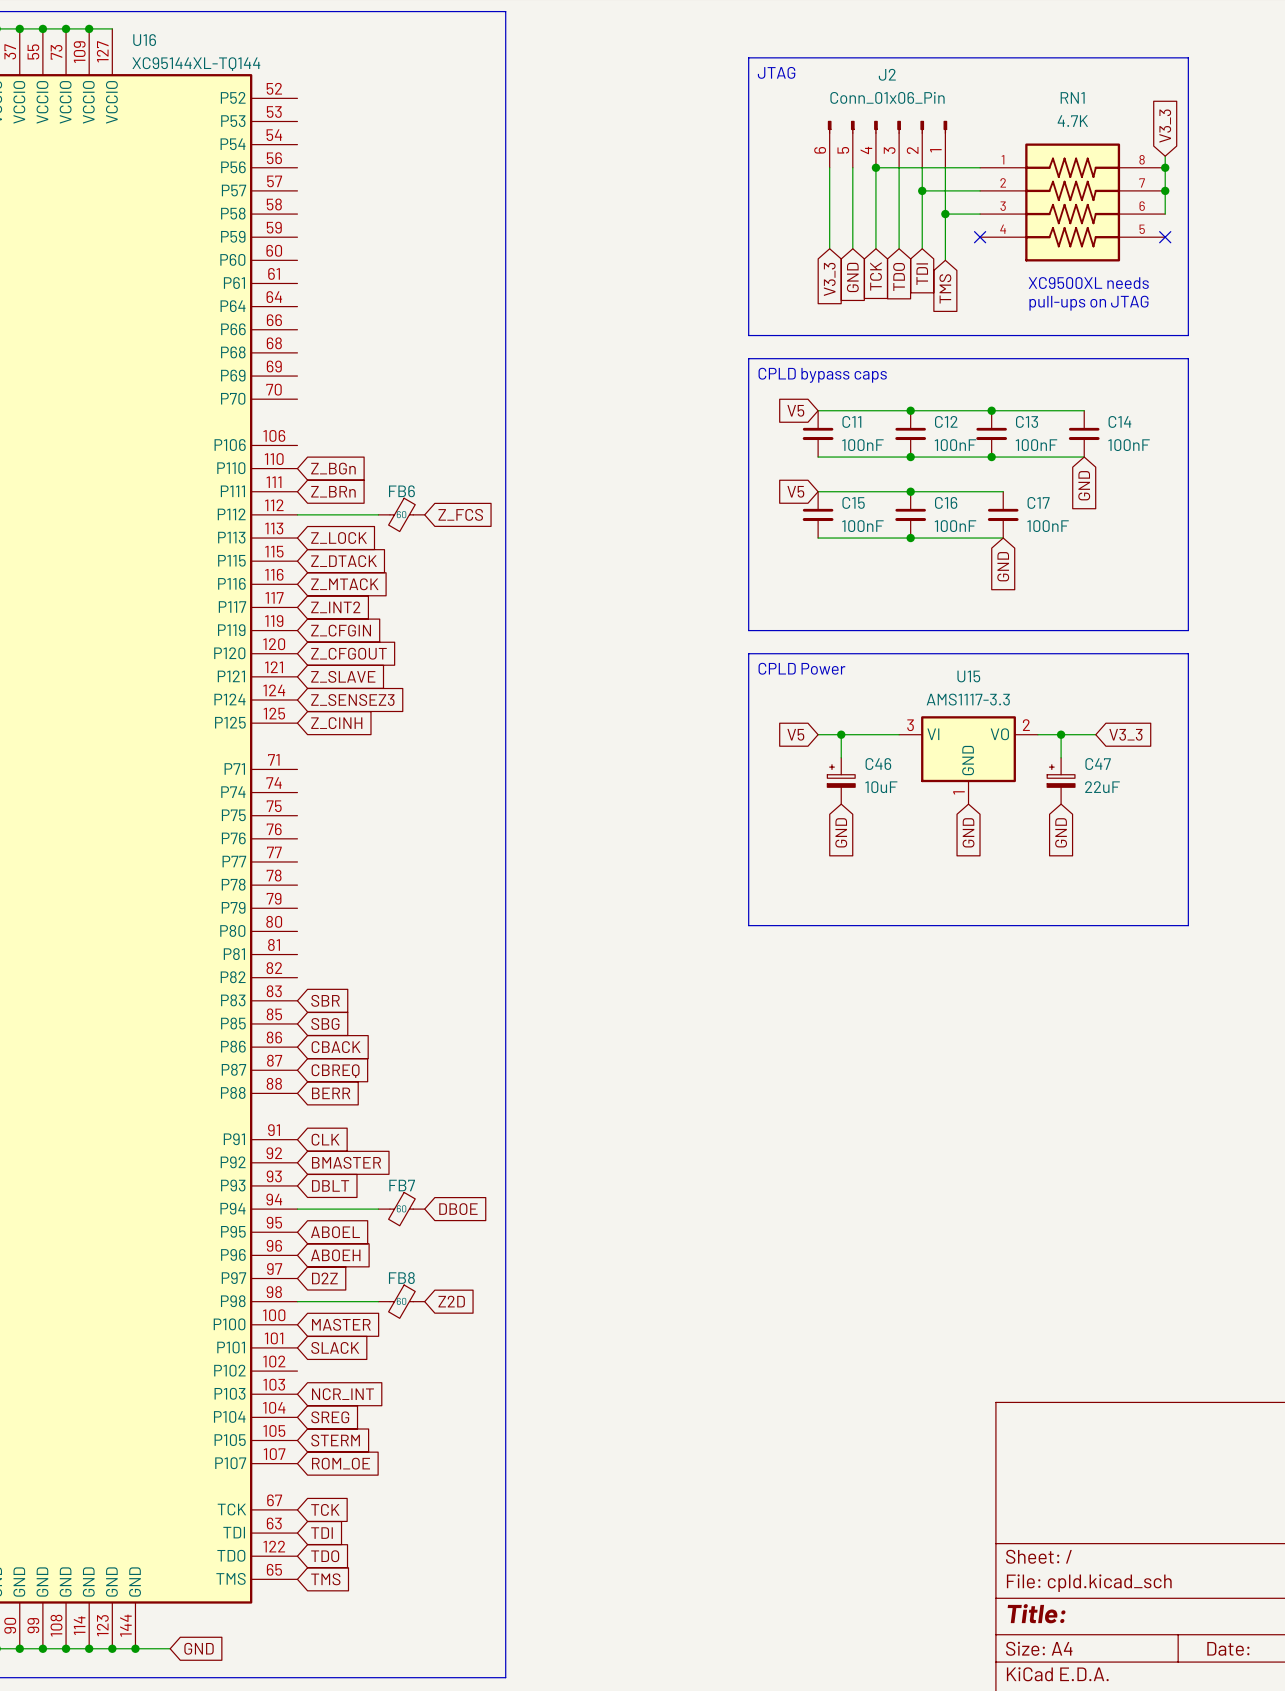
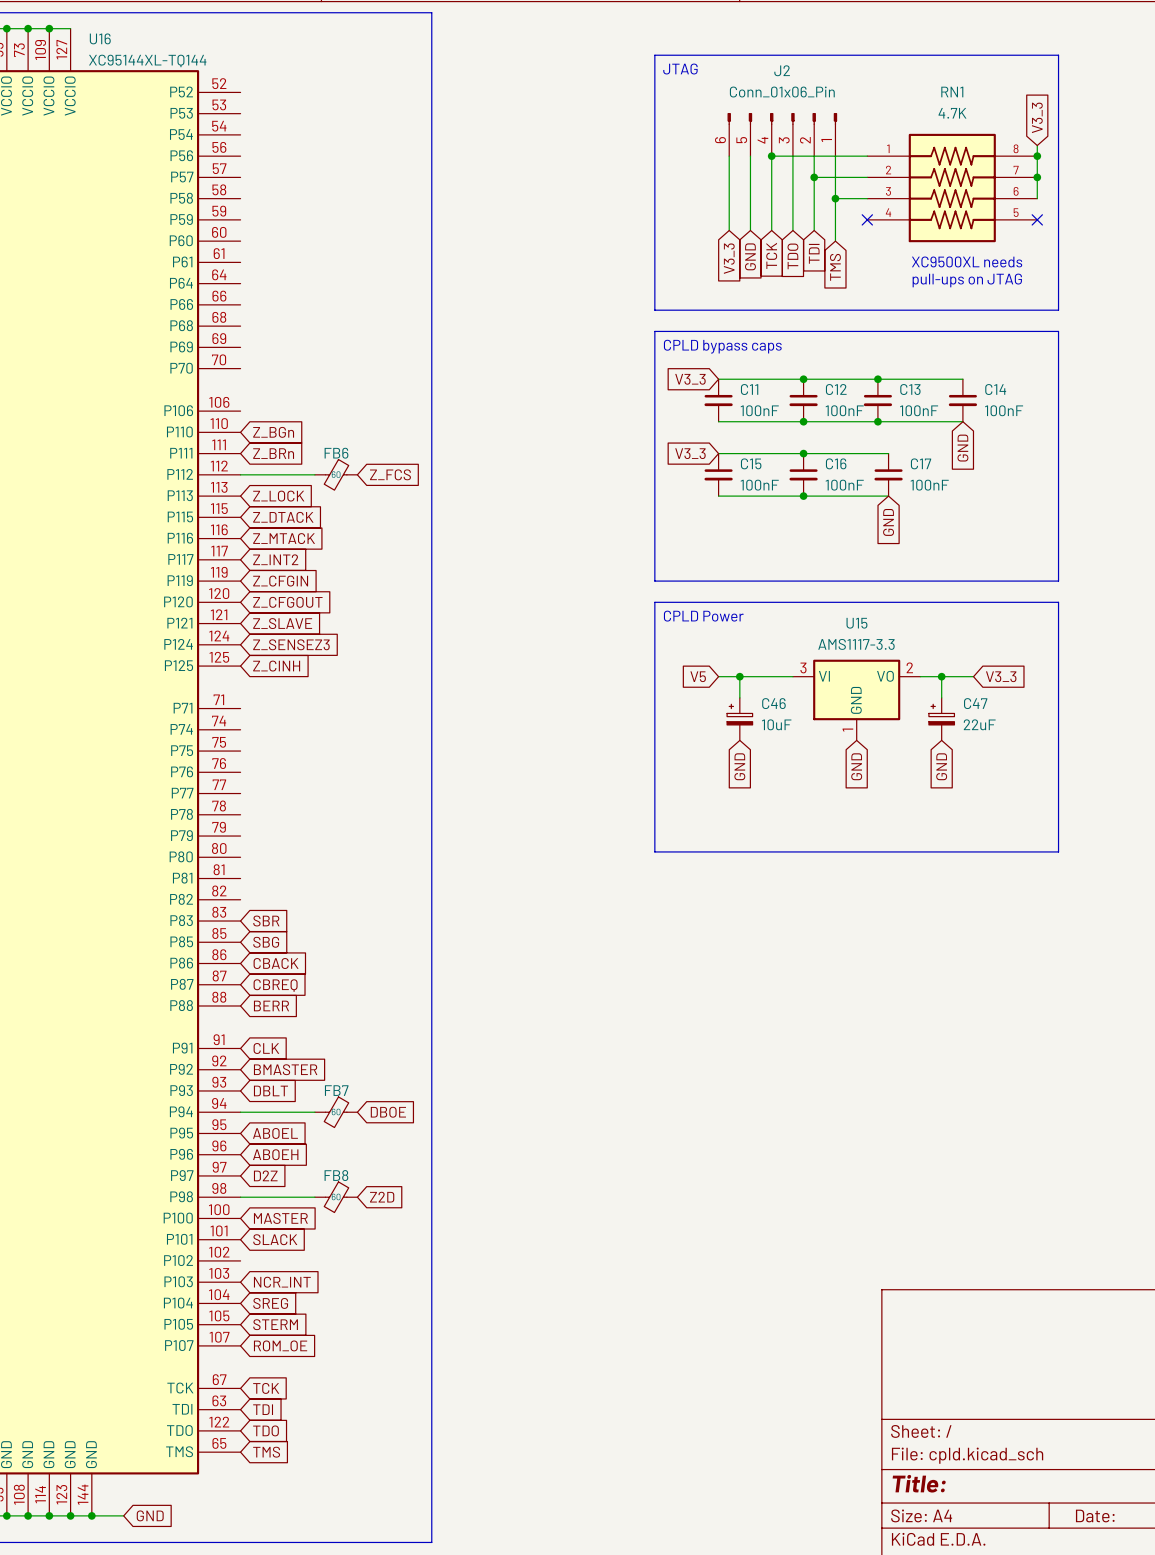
global label: V5 (795, 410) -> V3_3 (690, 379)
global label: V5 (795, 491) -> V3_3 (690, 453)

